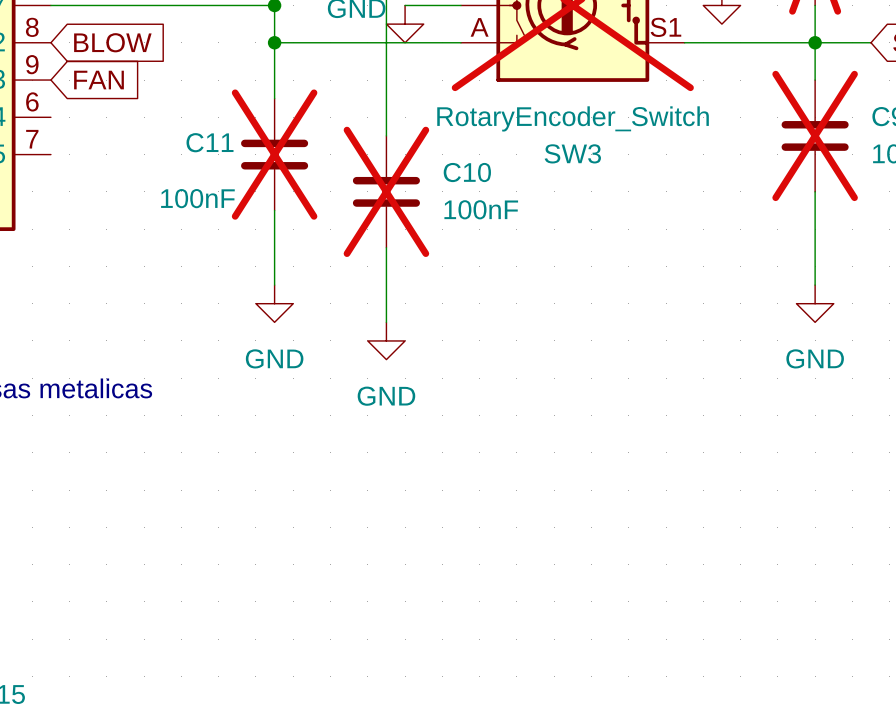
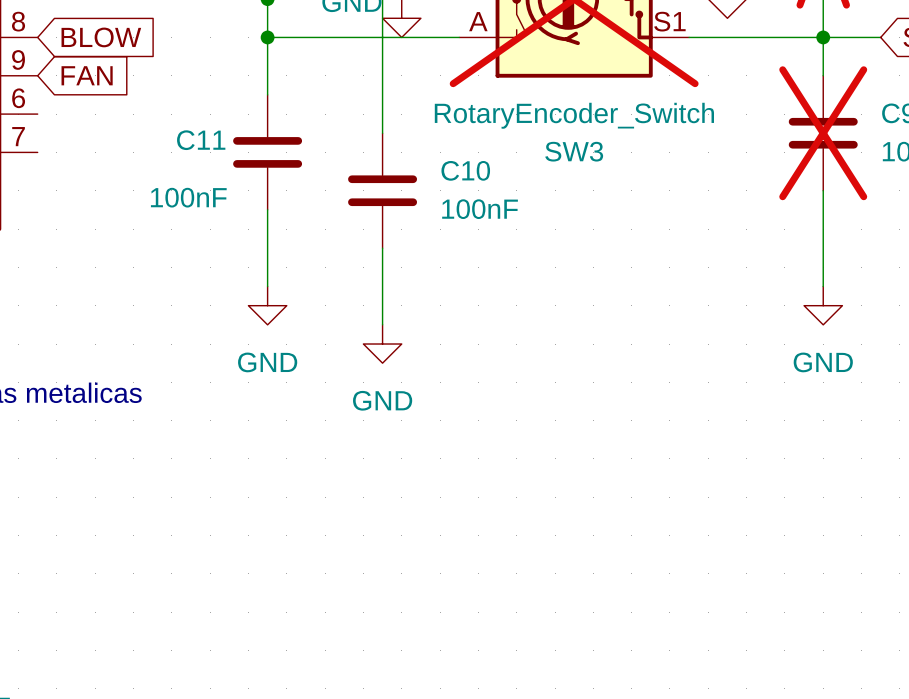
C11 do-not-place cross: (274, 154) -> none
C10 do-not-place cross: (386, 191) -> none

